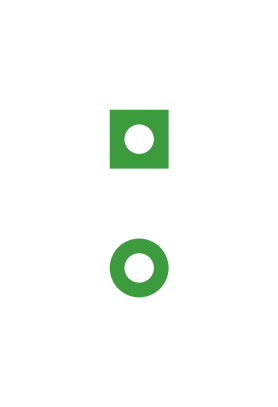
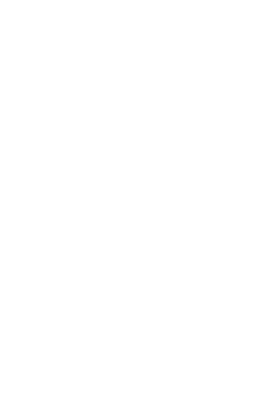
part: (139, 203) -> none

